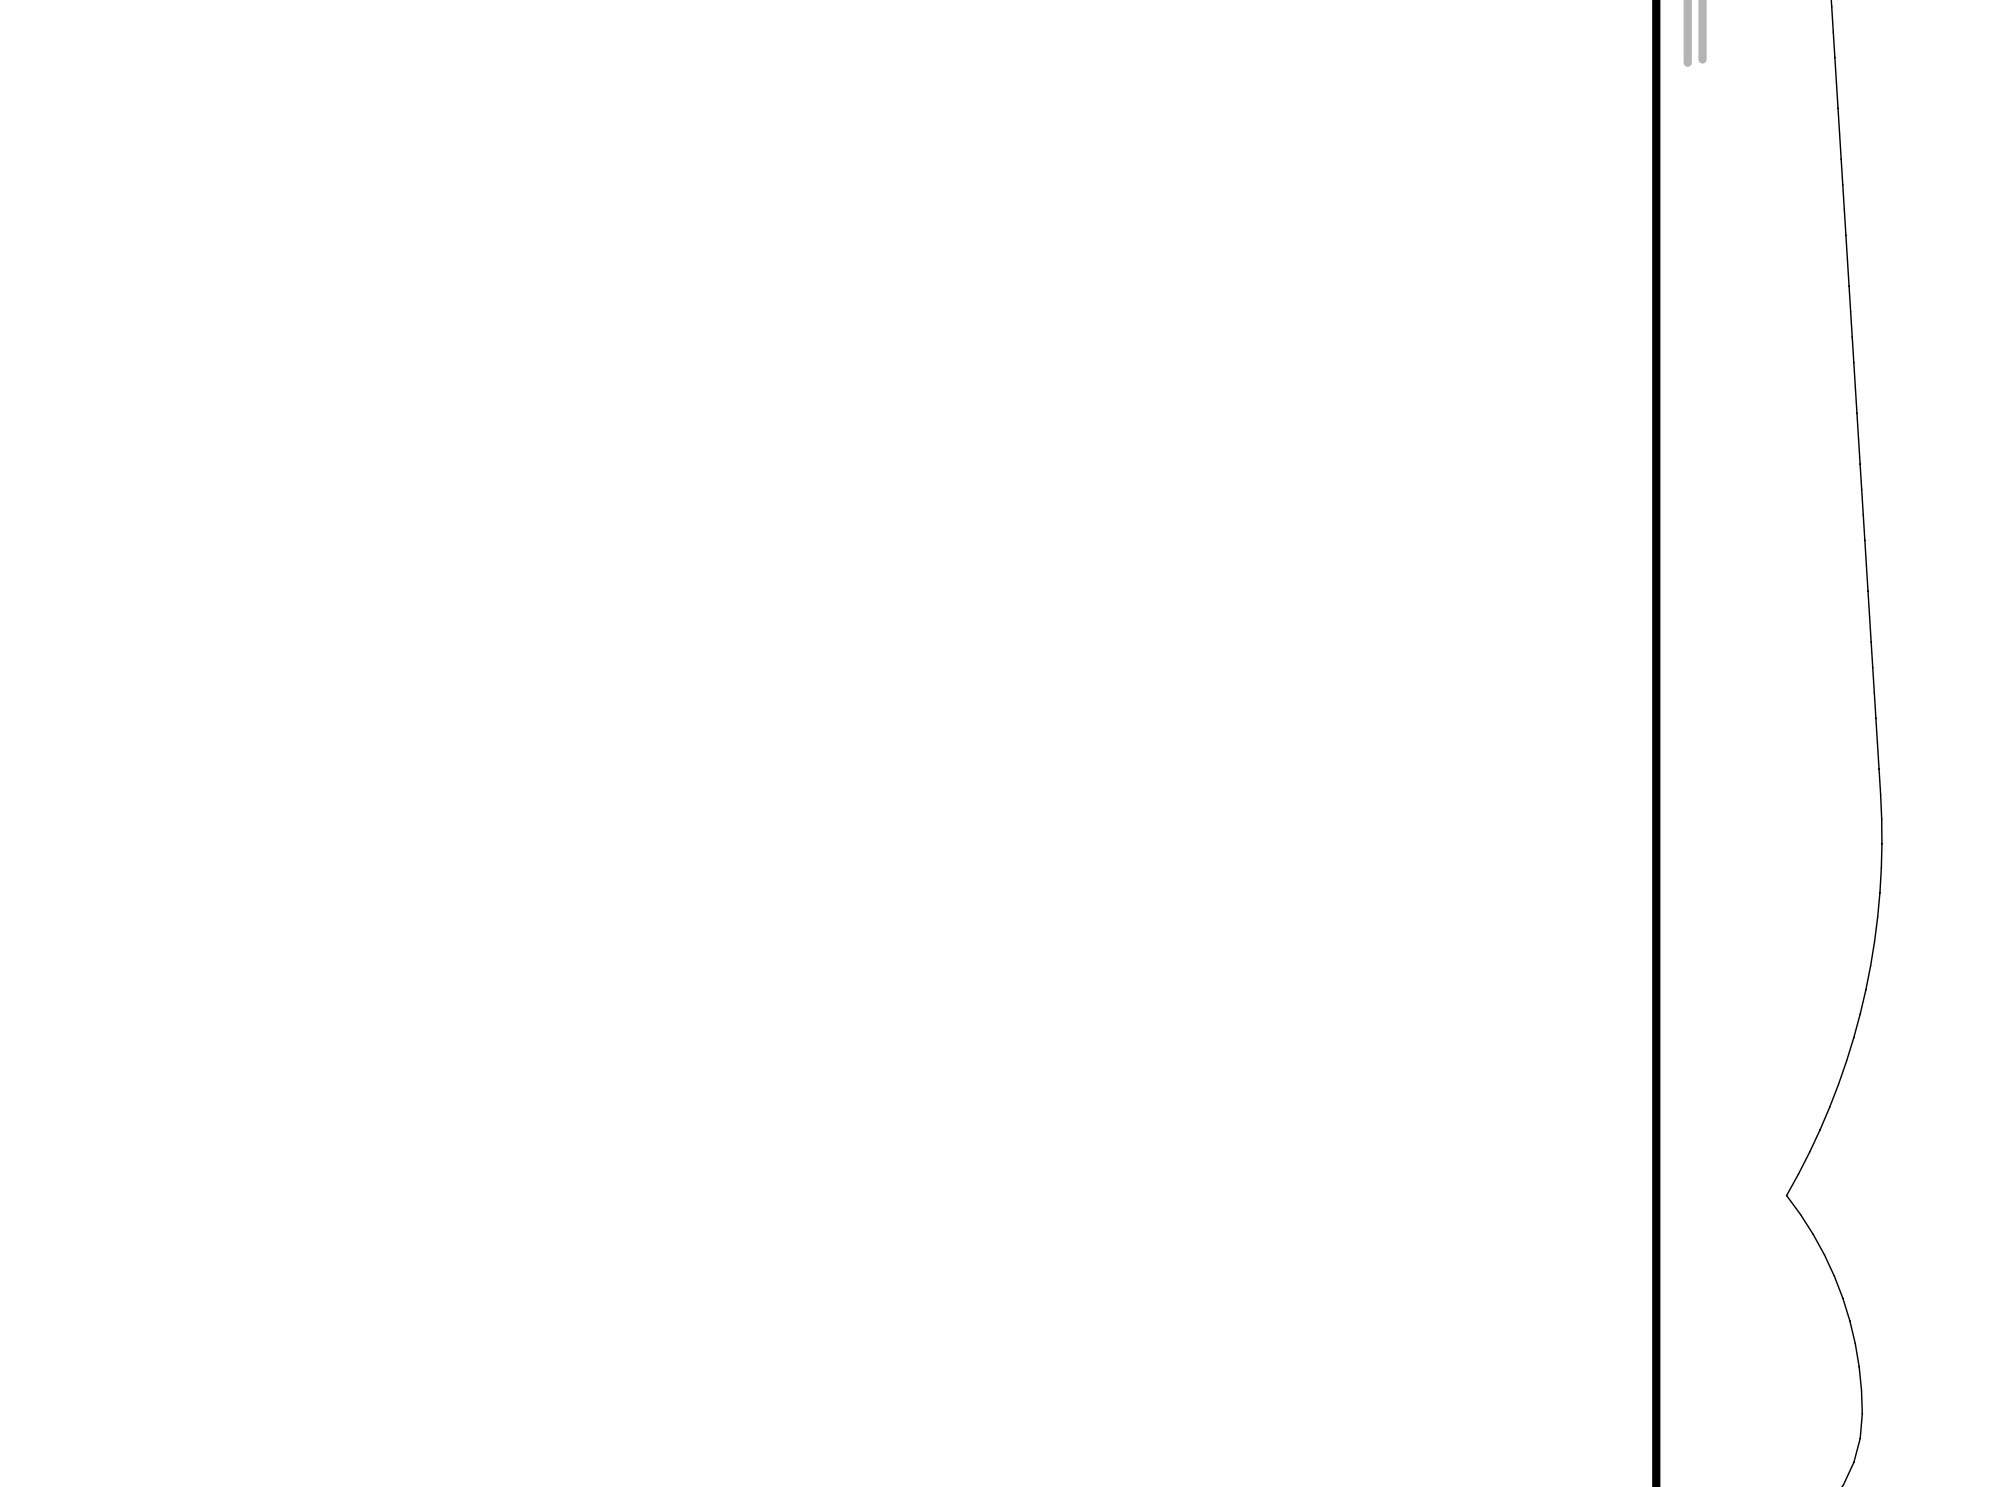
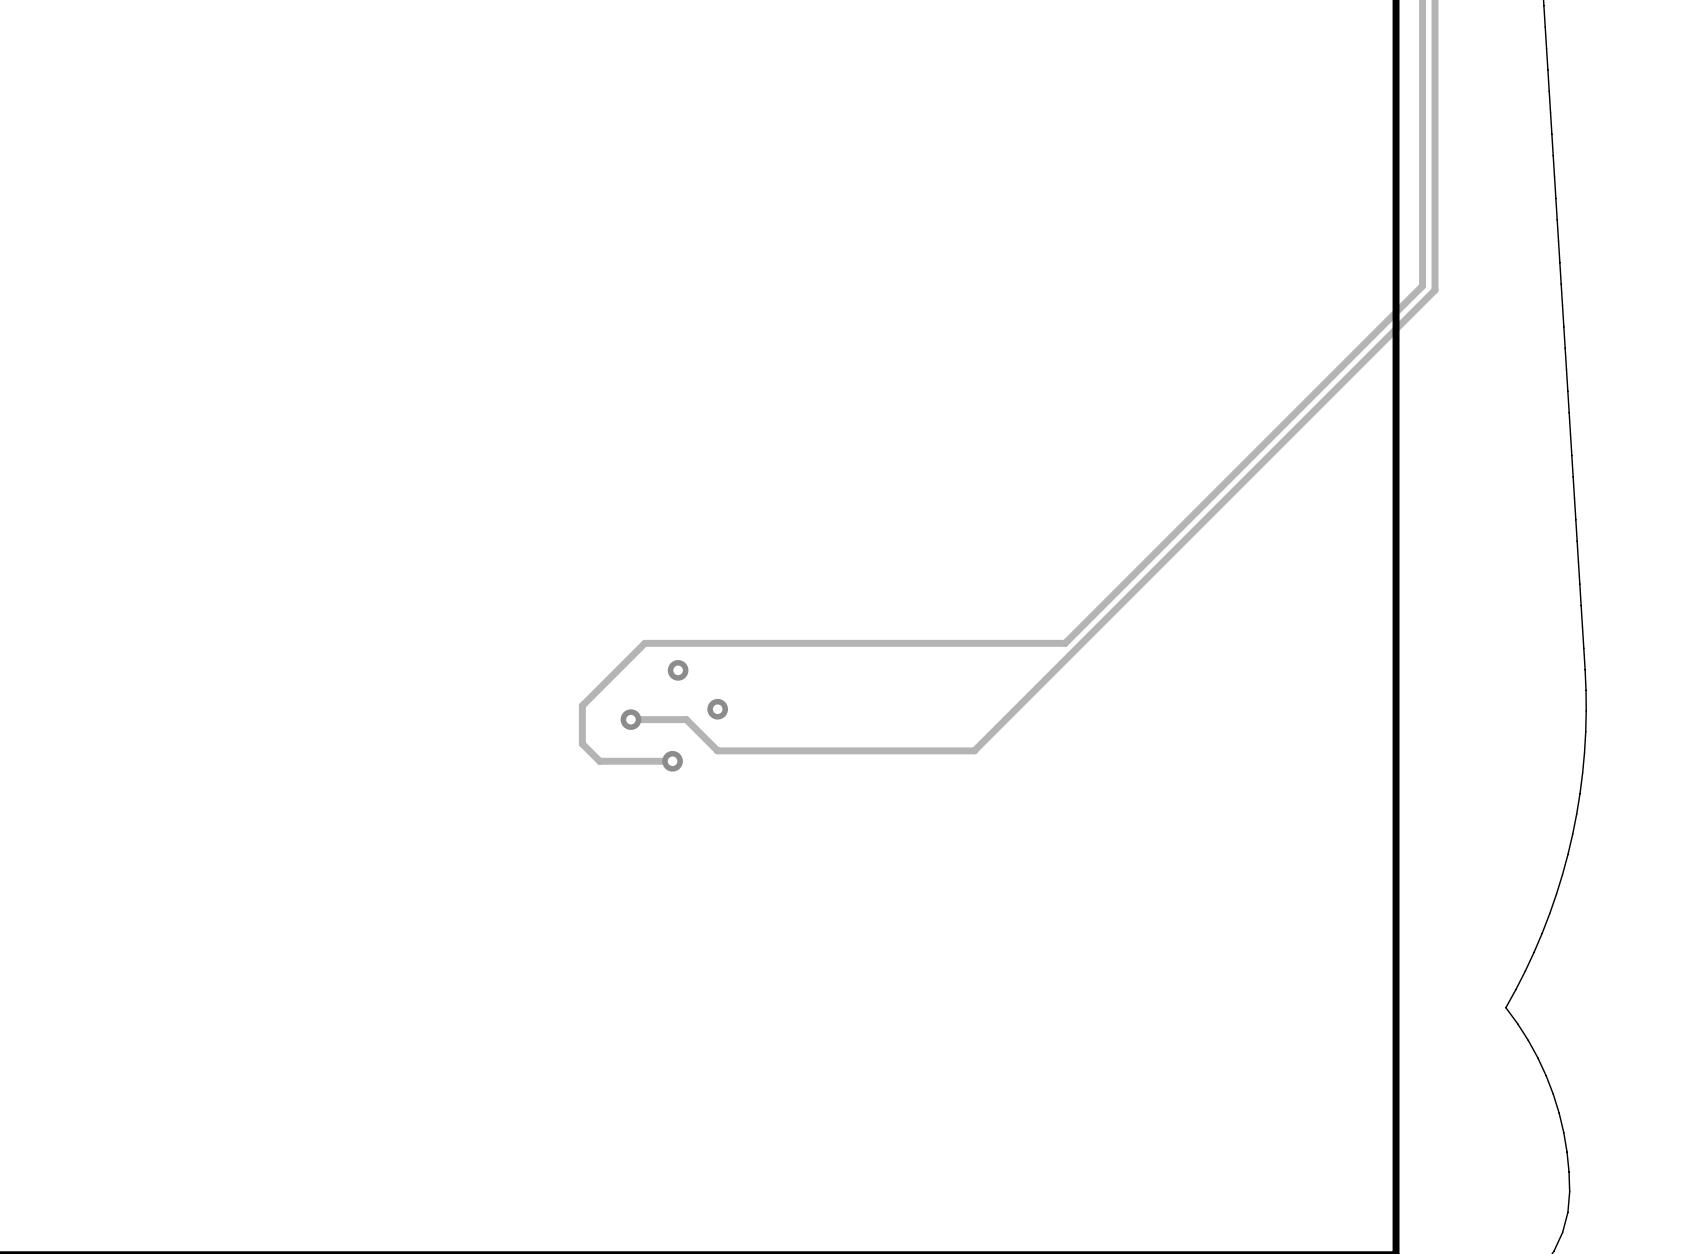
track: none -> (1435, 50) (1435, 290) (974, 750) (717, 750) (686, 719) (630, 719)
track: none -> (1422, 52) (1422, 286) (1065, 643) (644, 643) (582, 705) (582, 743) (599, 761) (672, 761)
via: none -> (678, 670)
via: none -> (717, 709)
via: none -> (630, 719)
via: none -> (672, 761)

